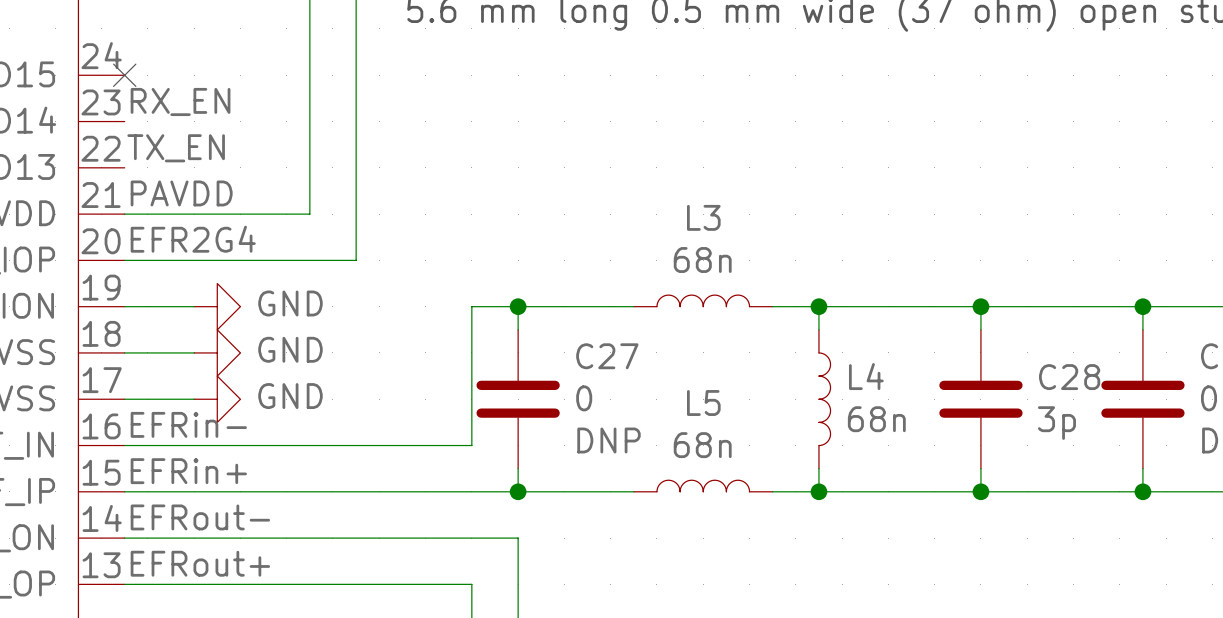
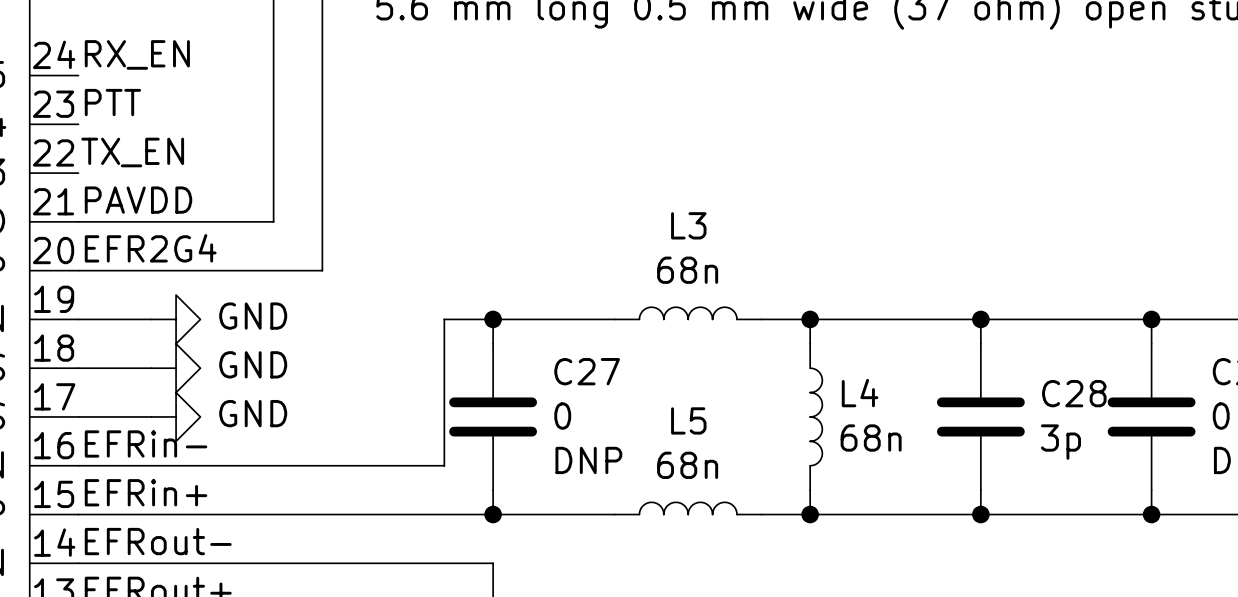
label: none -> RX_EN (137, 54)
no-connect mark: (124, 75) -> none
label: RX_EN (180, 101) -> PTT (112, 102)

